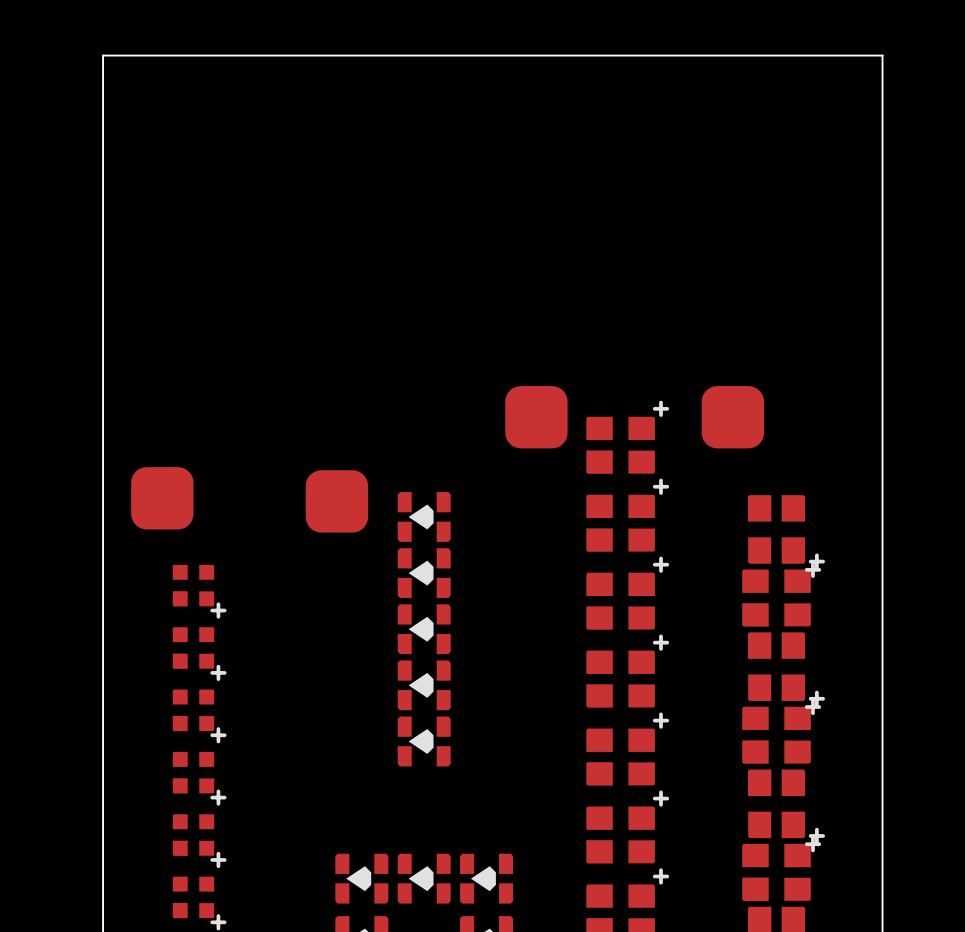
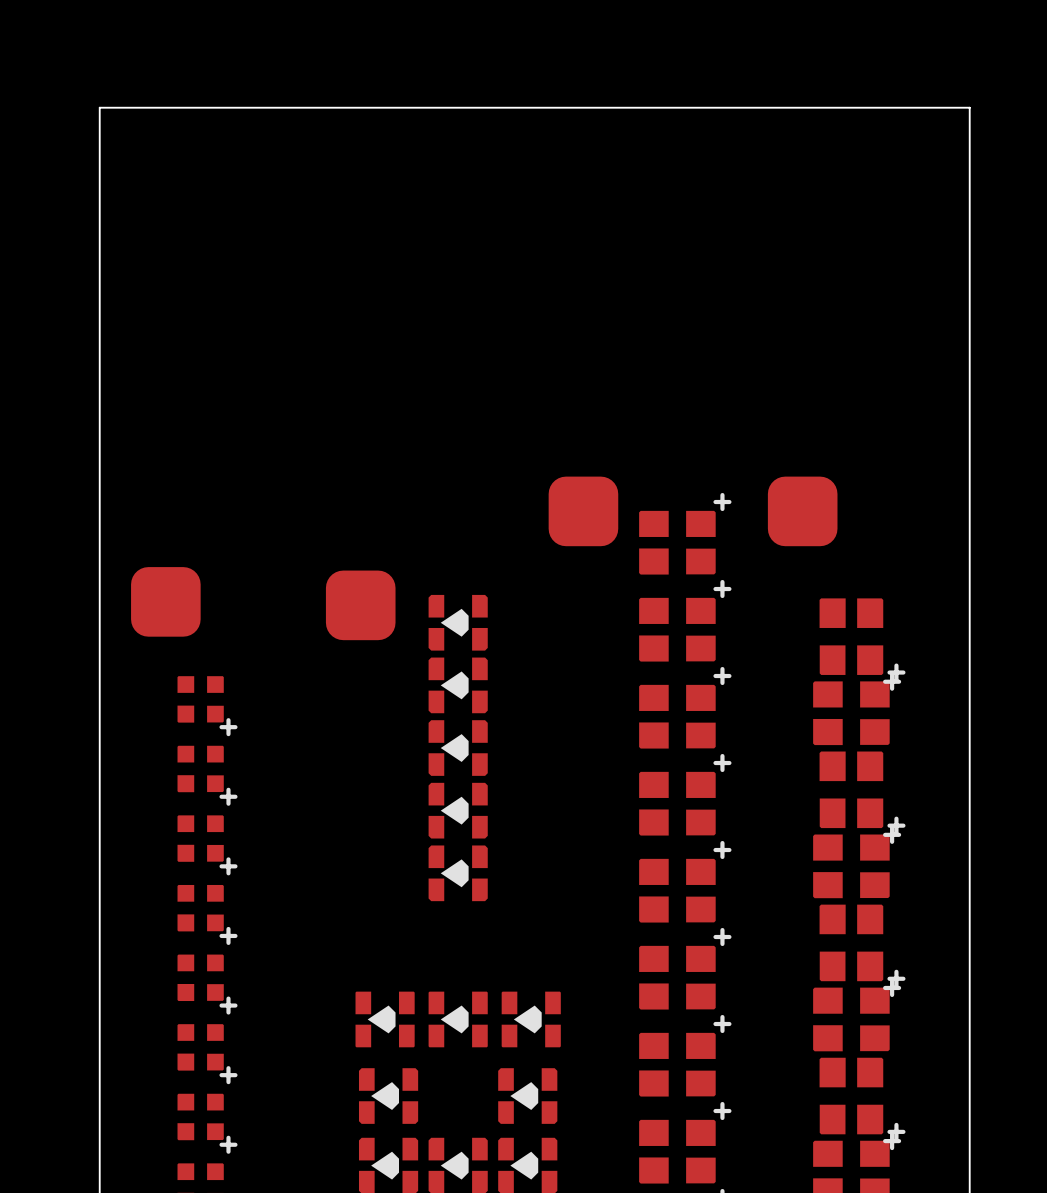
part footprint: [335, 853, 389, 904] -> [355, 991, 415, 1048]
part footprint: [397, 853, 451, 904] -> [428, 991, 488, 1048]
part footprint: [460, 853, 514, 904] -> [501, 991, 561, 1048]

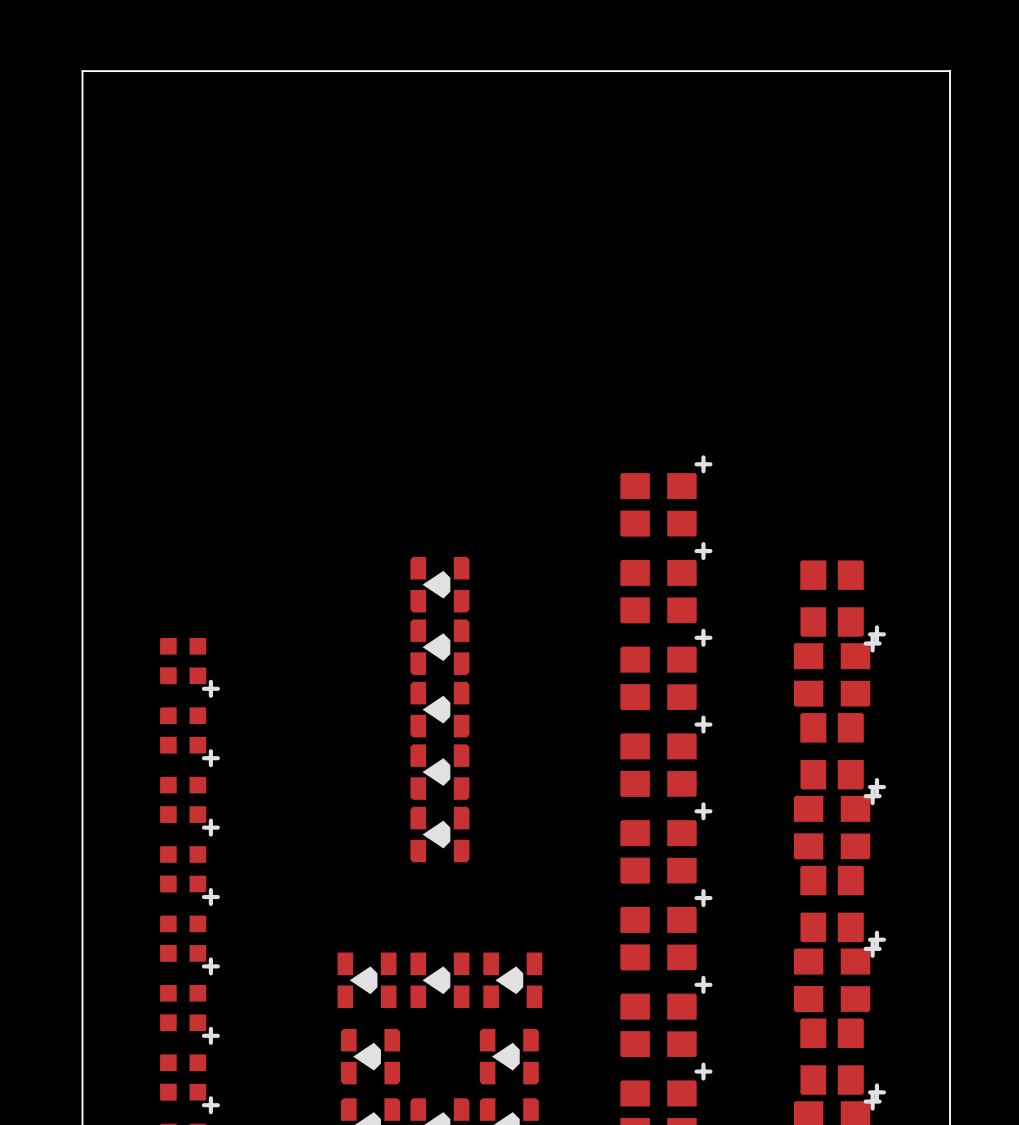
part: (583, 511) -> none
part: (802, 511) -> none
part: (165, 601) -> none
part: (360, 605) -> none

